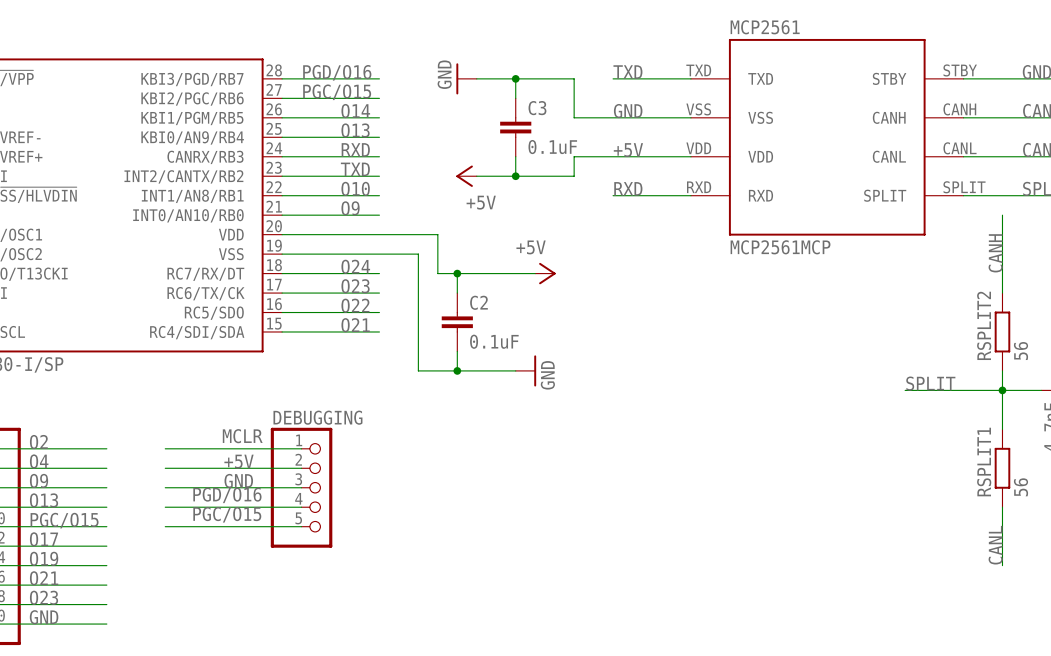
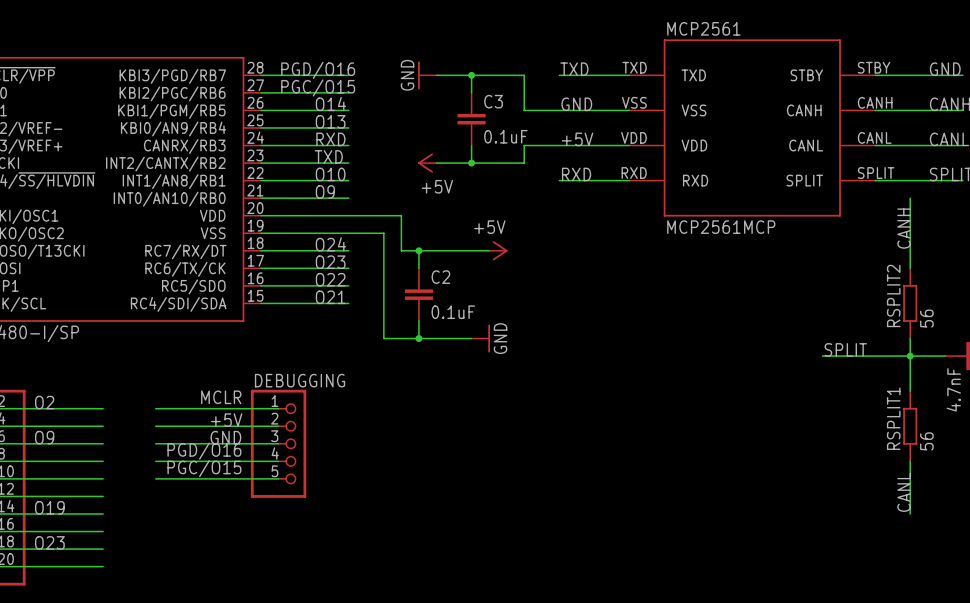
label: O4 (39, 461) -> none
label: O13 (44, 500) -> none
label: PGC/O15 (64, 520) -> none
label: O17 (44, 539) -> none
label: O21 (44, 578) -> none
label: GND (44, 617) -> none

